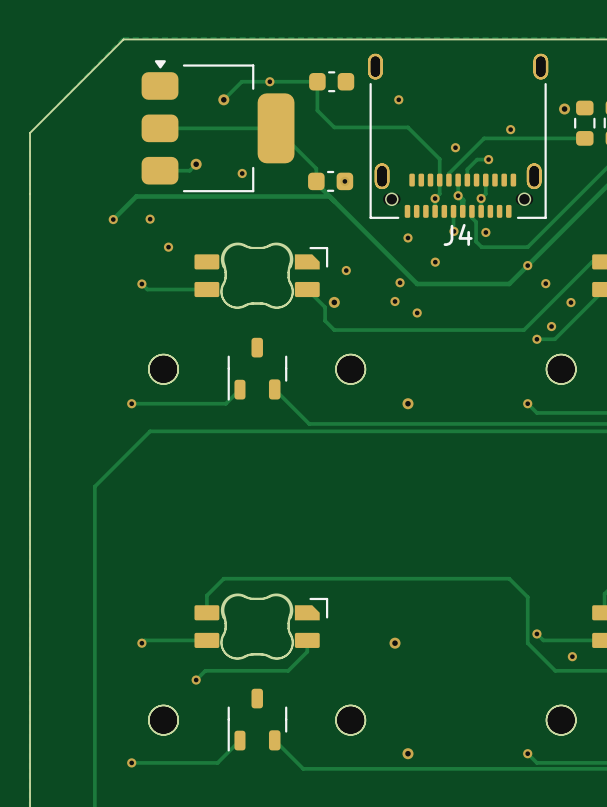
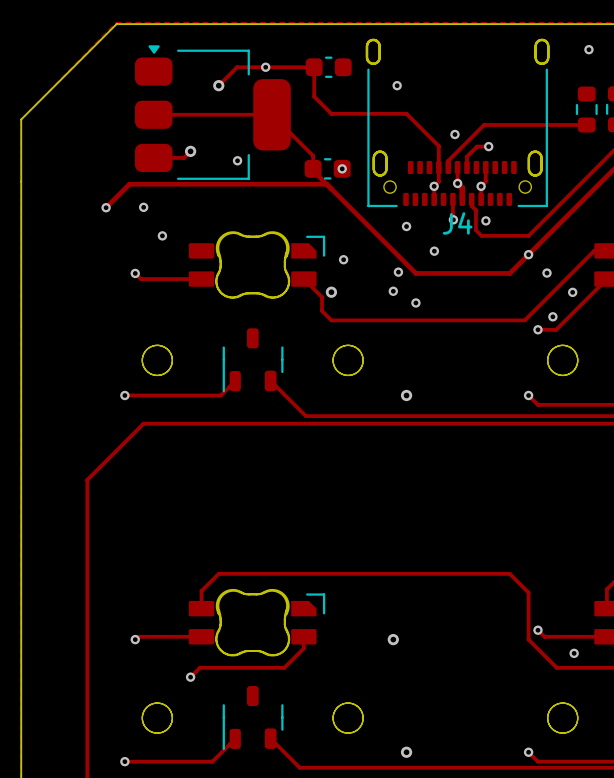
via: (564, 109) -> none
via position: (510, 129) -> (588, 49)

